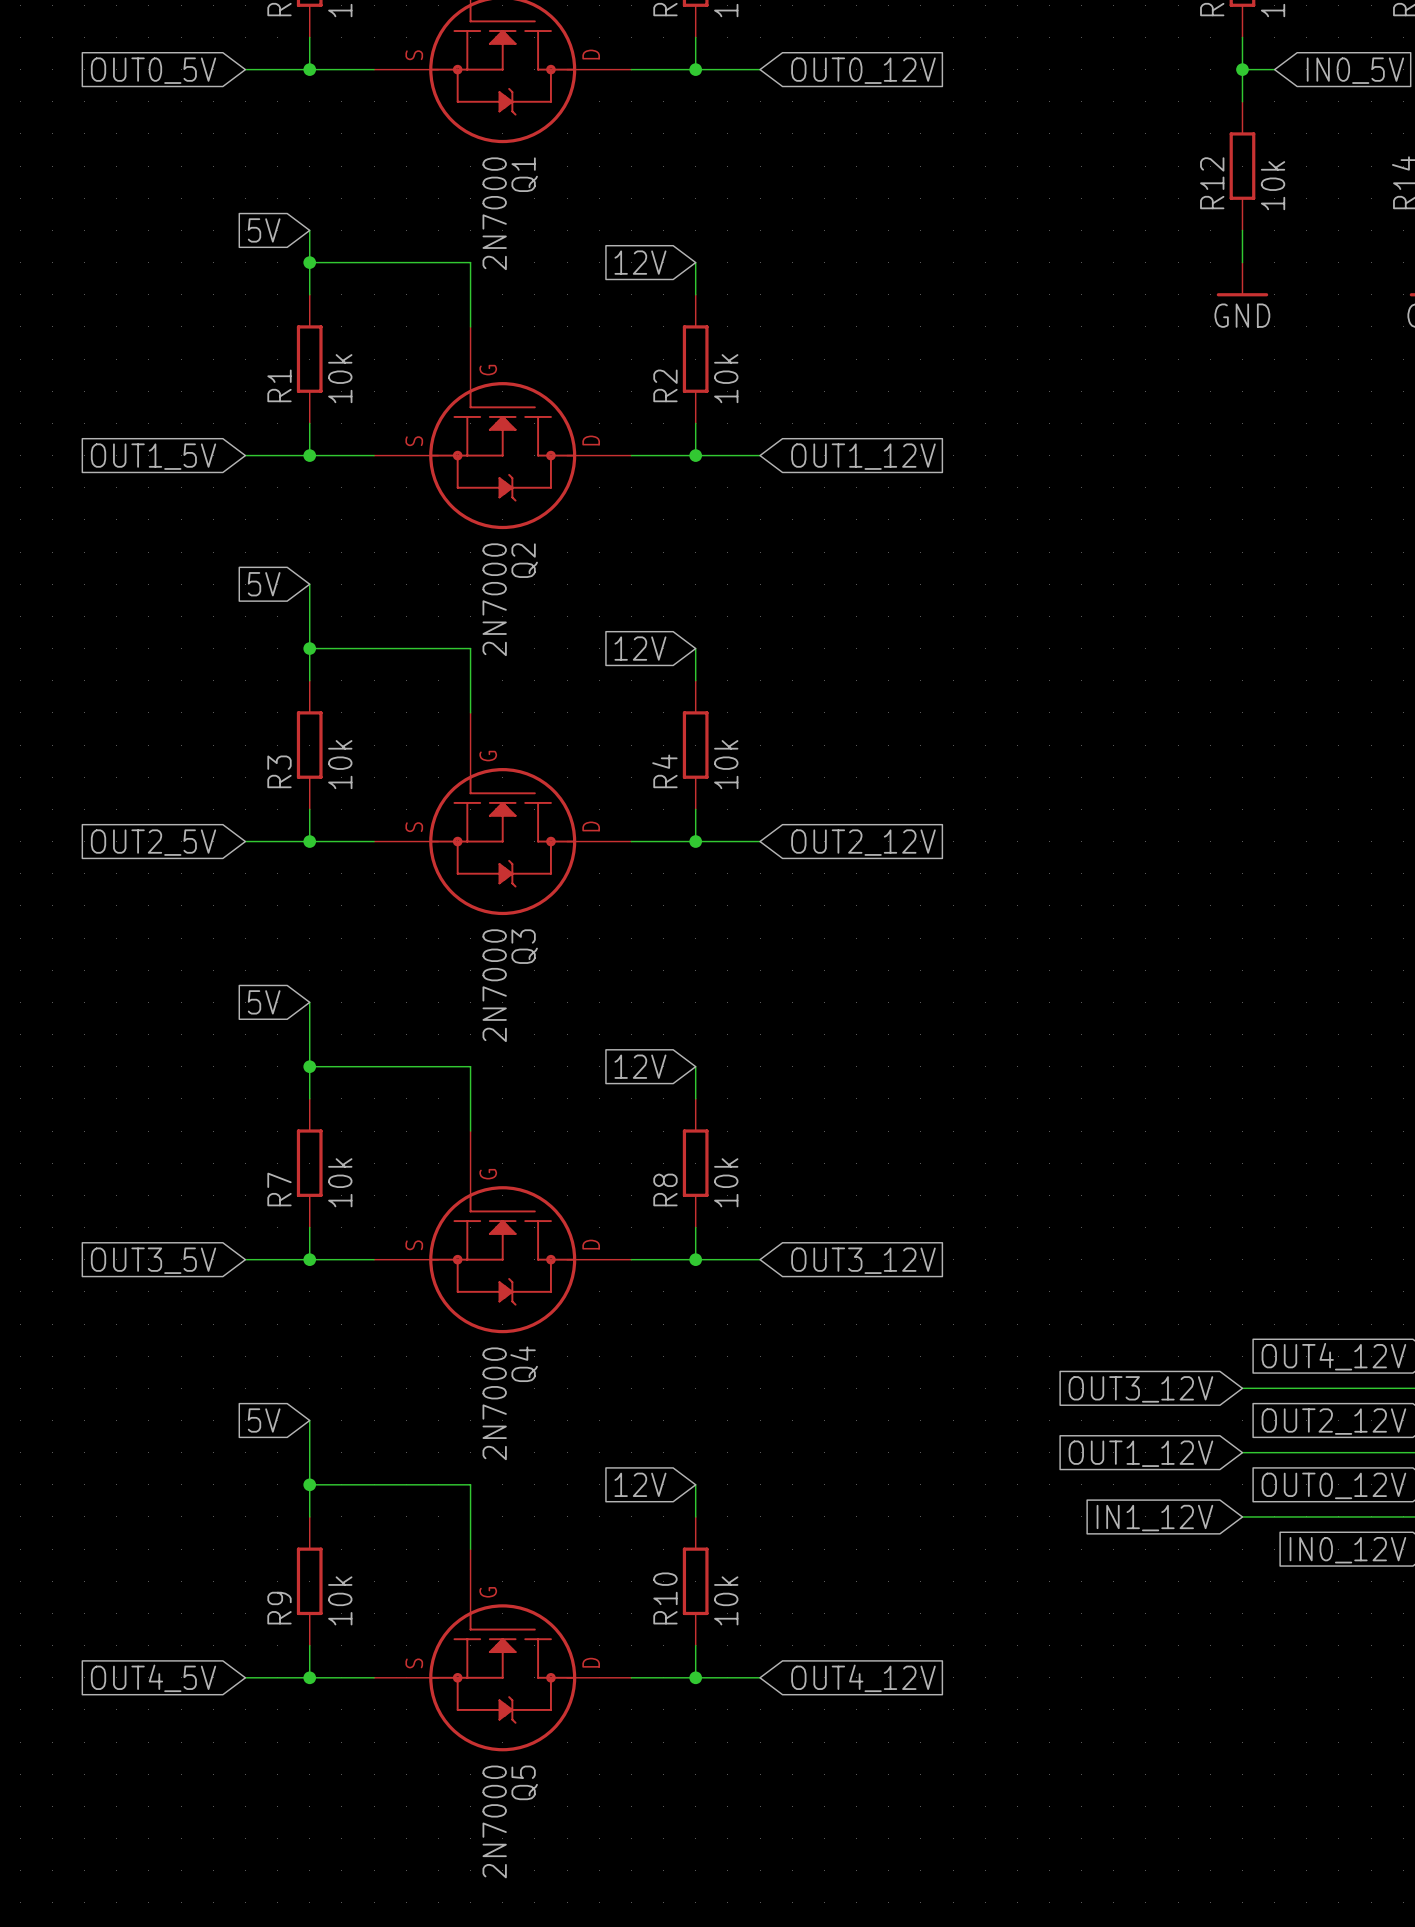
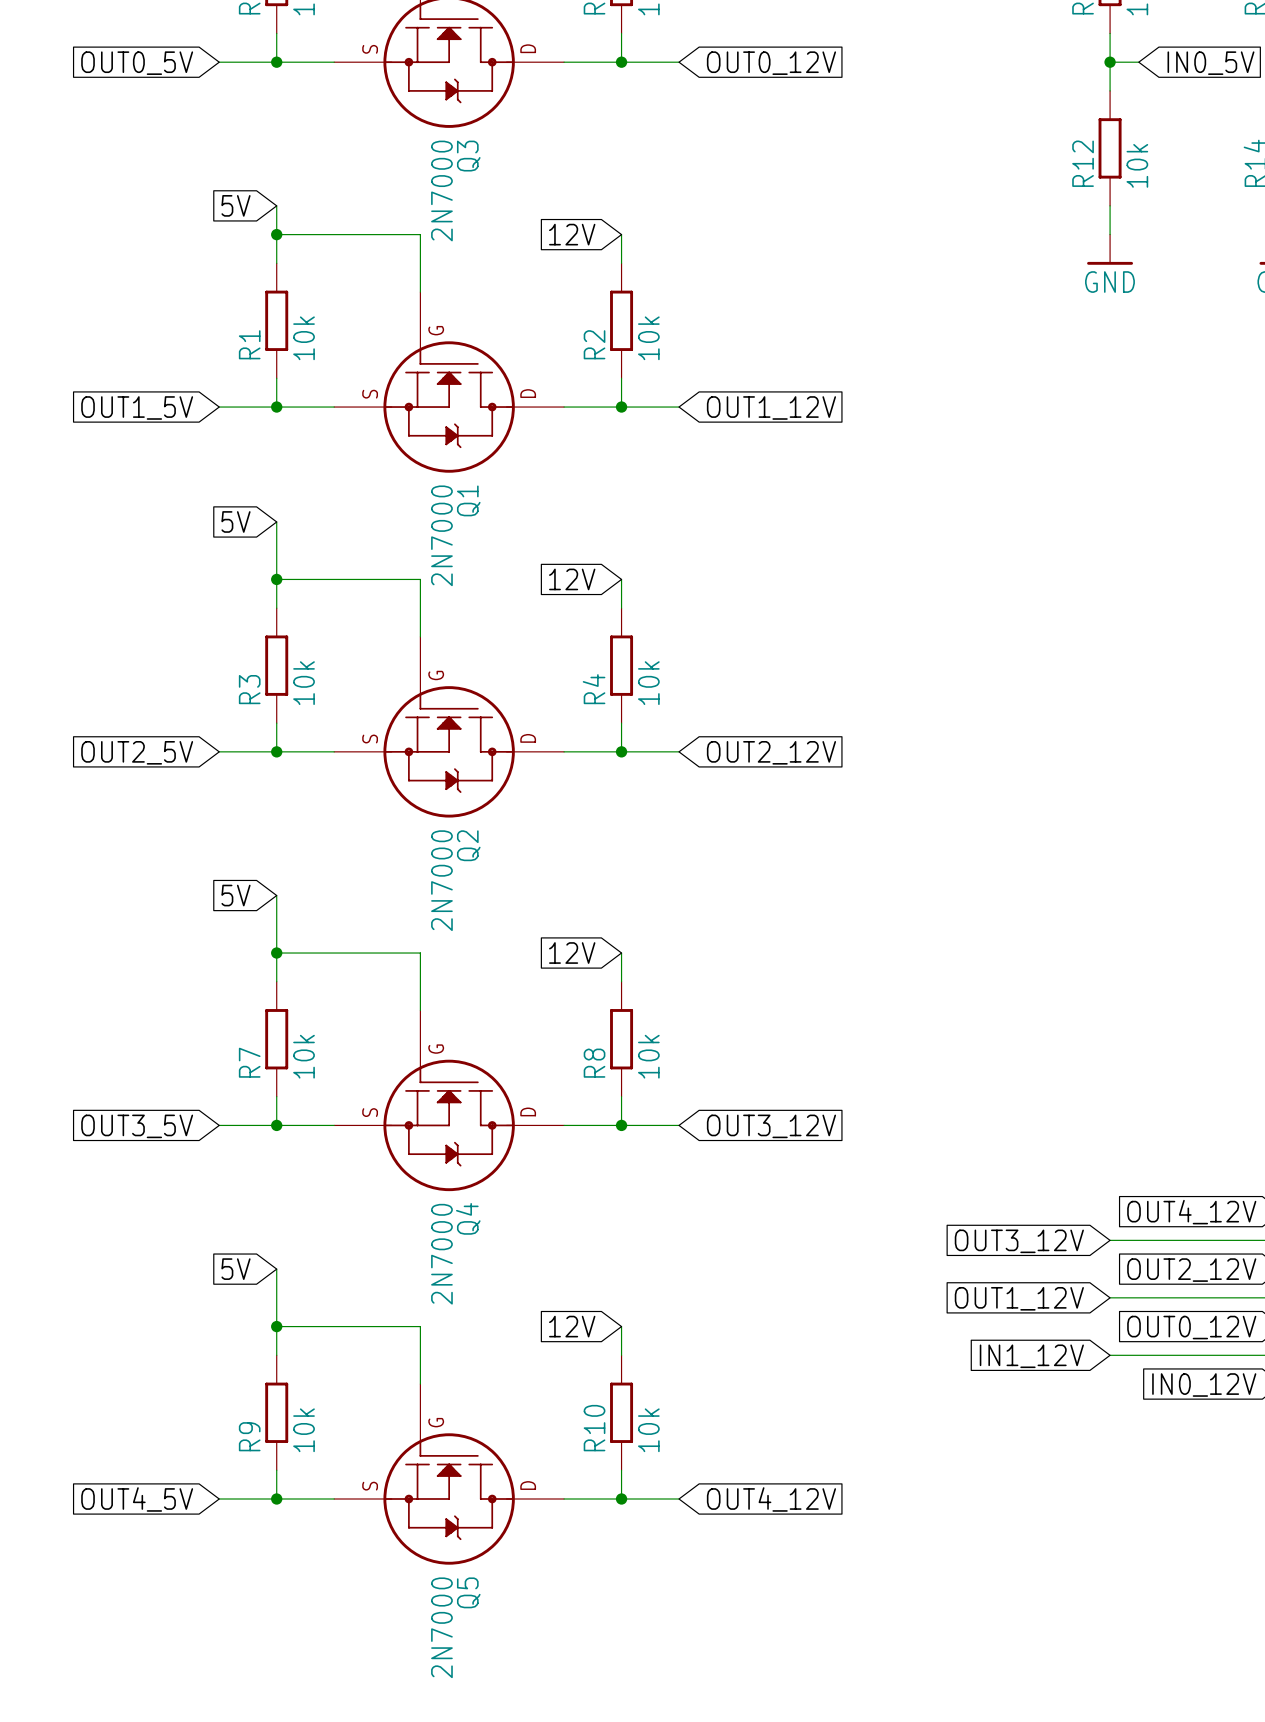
Q1 name: Q1 (524, 174) -> Q3 (468, 156)
Q2 name: Q2 (524, 560) -> Q1 (468, 500)
Q3 name: Q3 (524, 946) -> Q2 (468, 845)

